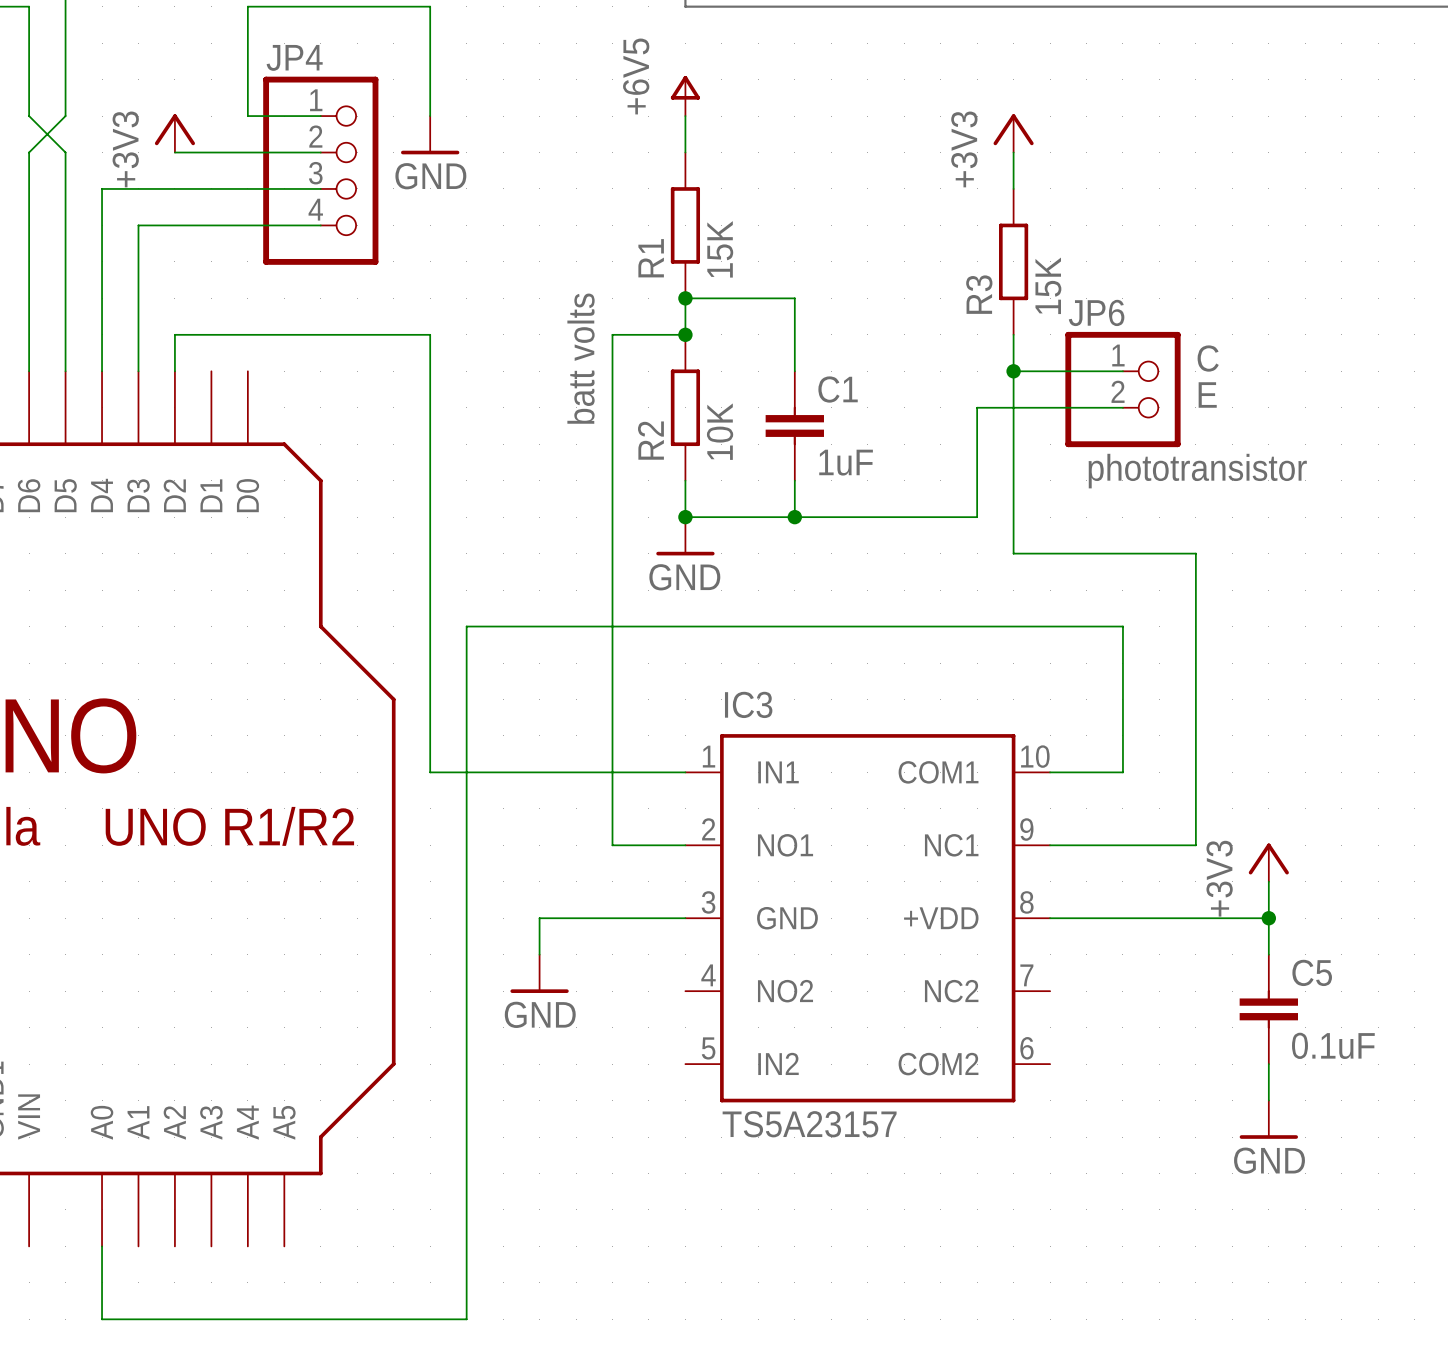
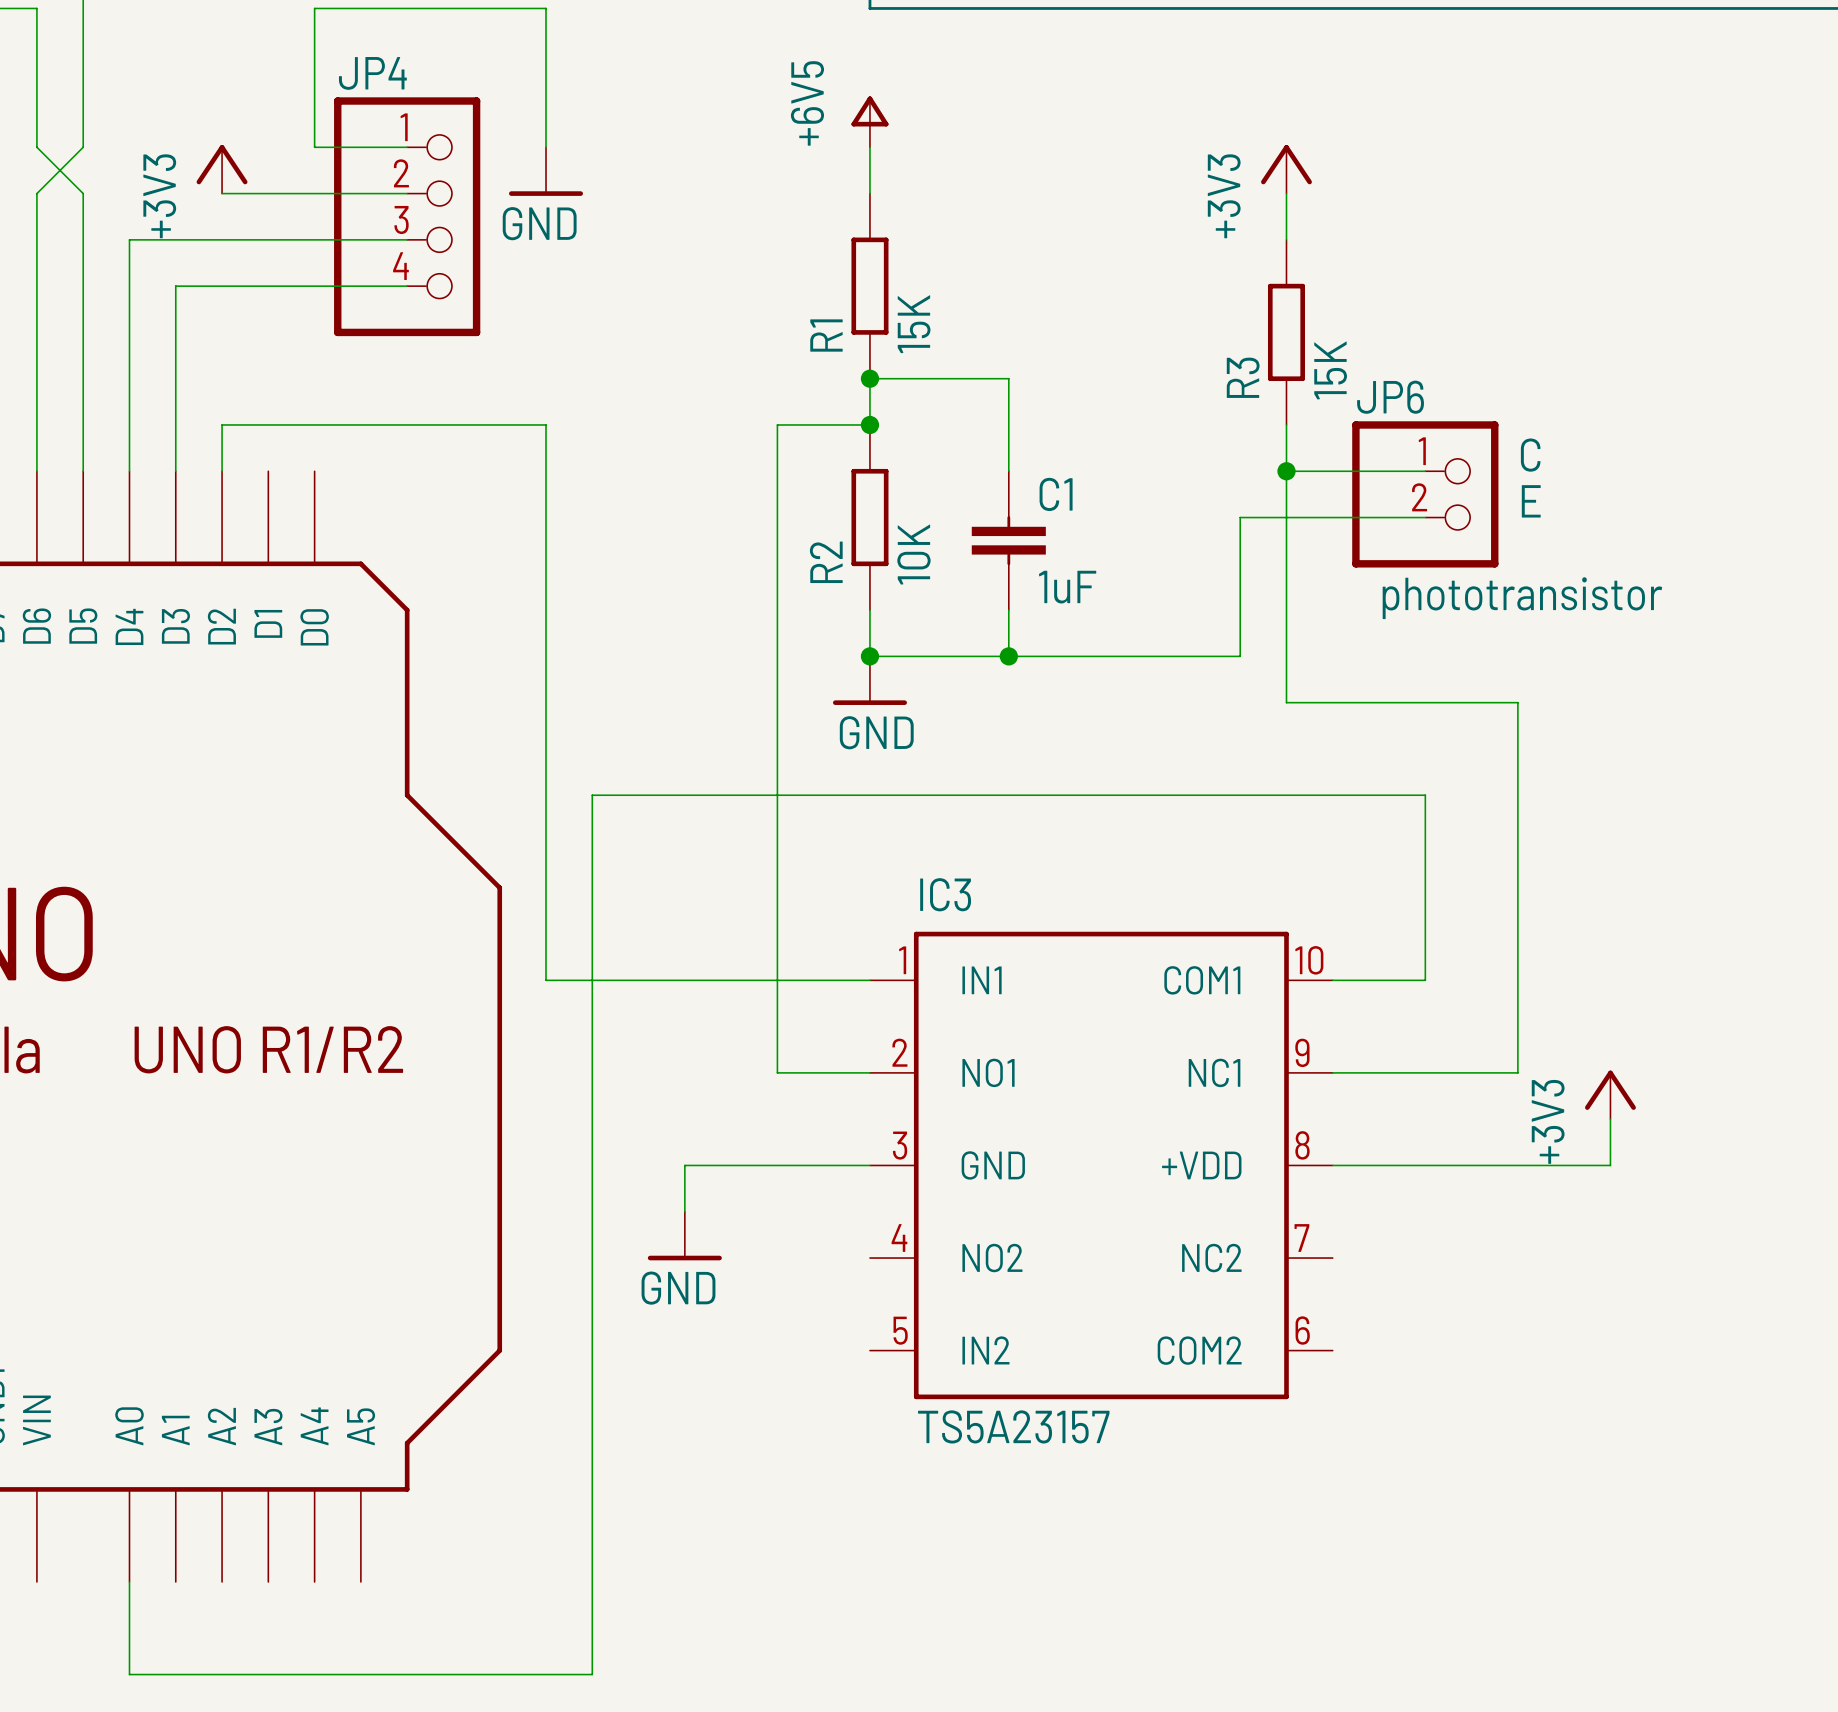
text: batt volts (581, 358) -> none
wire: (1268, 918) (1268, 954) -> none
junction: (1268, 918) -> none
C5: 0.1uF (1268, 1009) -> none
wire: (1268, 1064) (1268, 1100) -> none
power symbol: GND (1268, 1119) -> none

